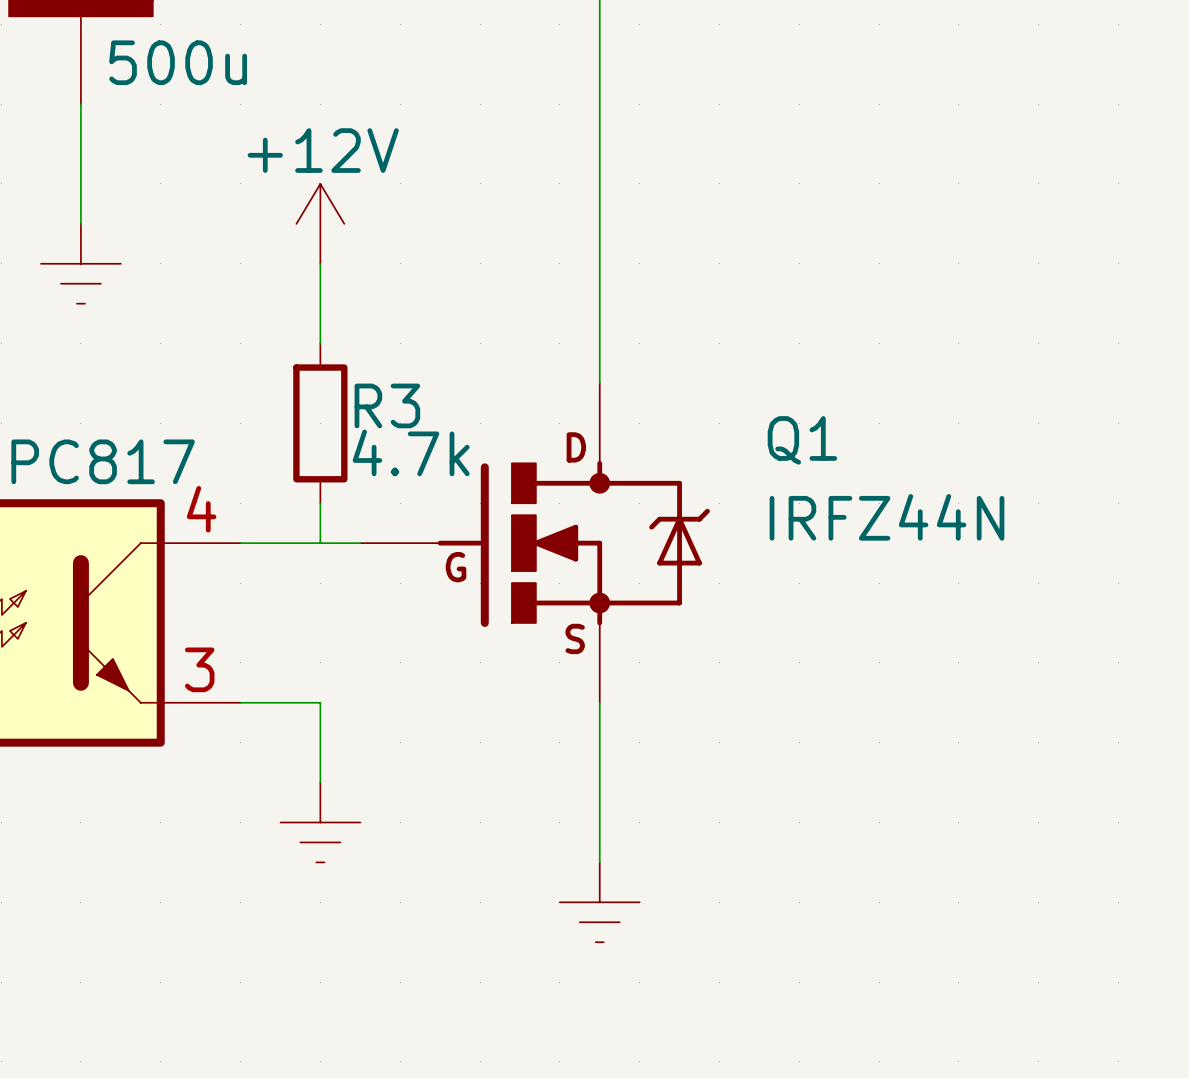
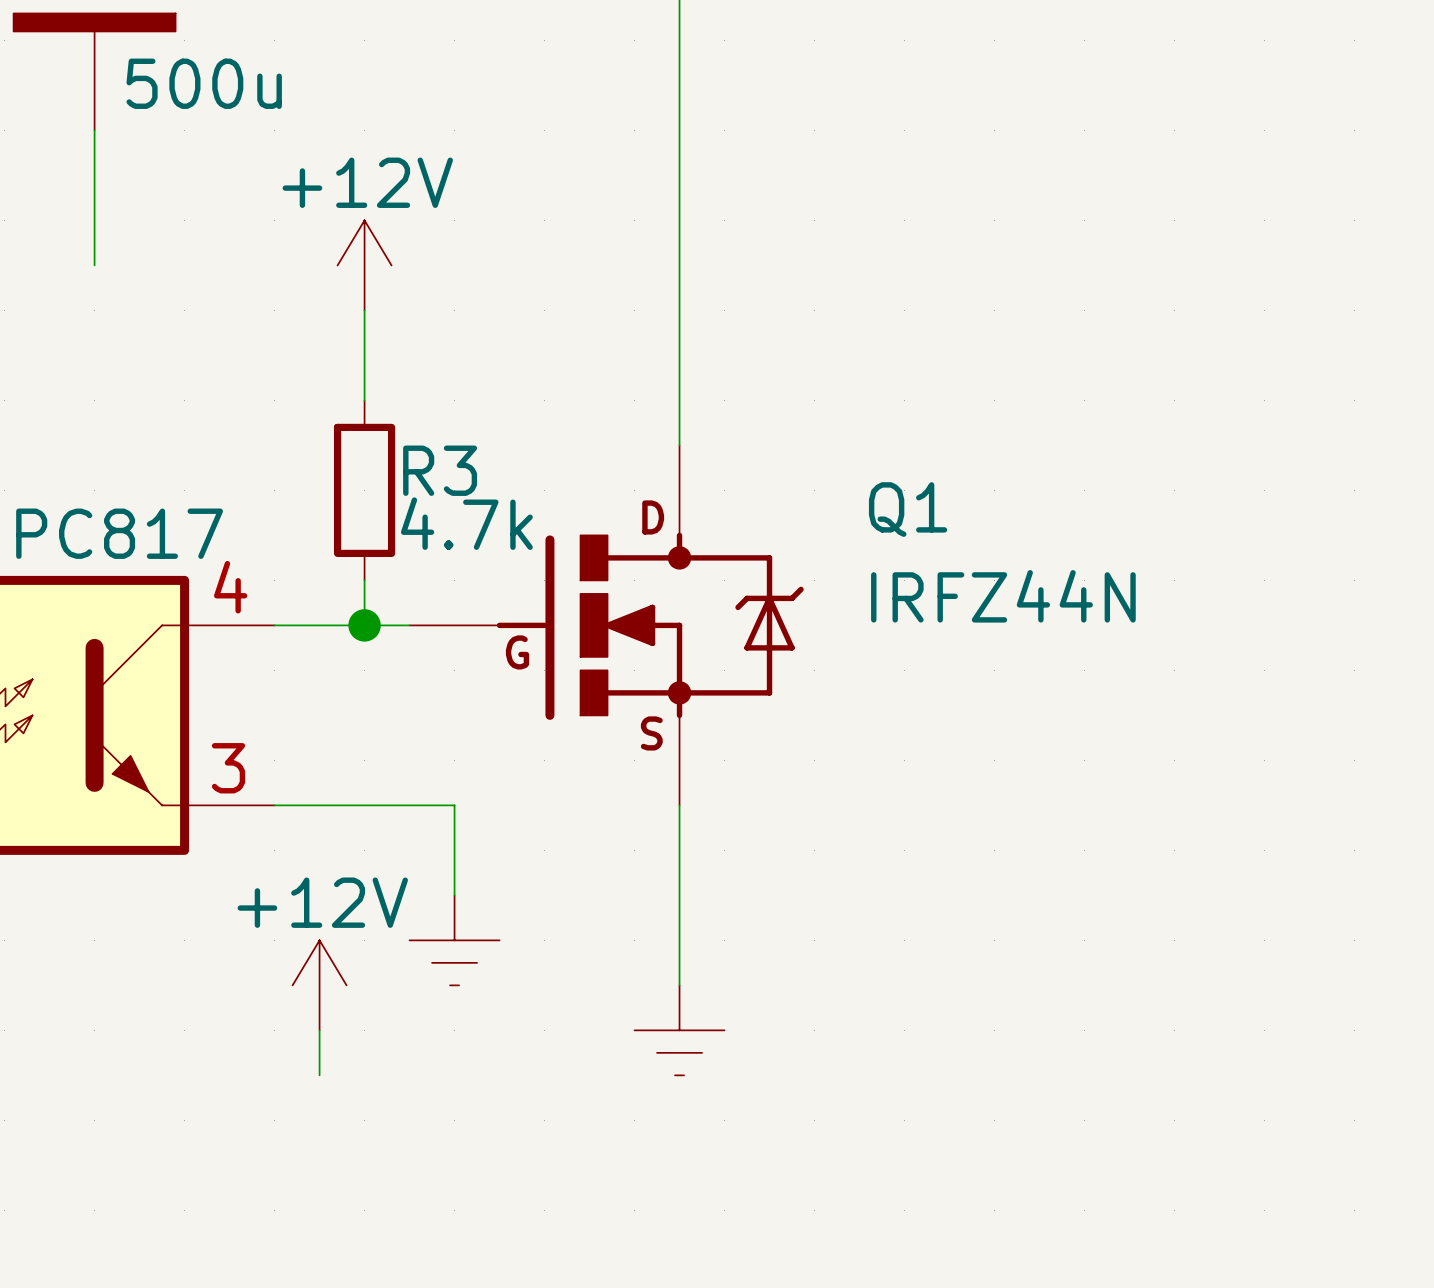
power symbol: (80, 263) -> none
junction: none -> (364, 625)
wire: (320, 702) (320, 782) -> (364, 805) (454, 805) (454, 895)
power symbol position: (320, 822) -> (454, 940)
power symbol: none -> +12V (319, 985)
wire: none -> (319, 1030) (319, 1075)

